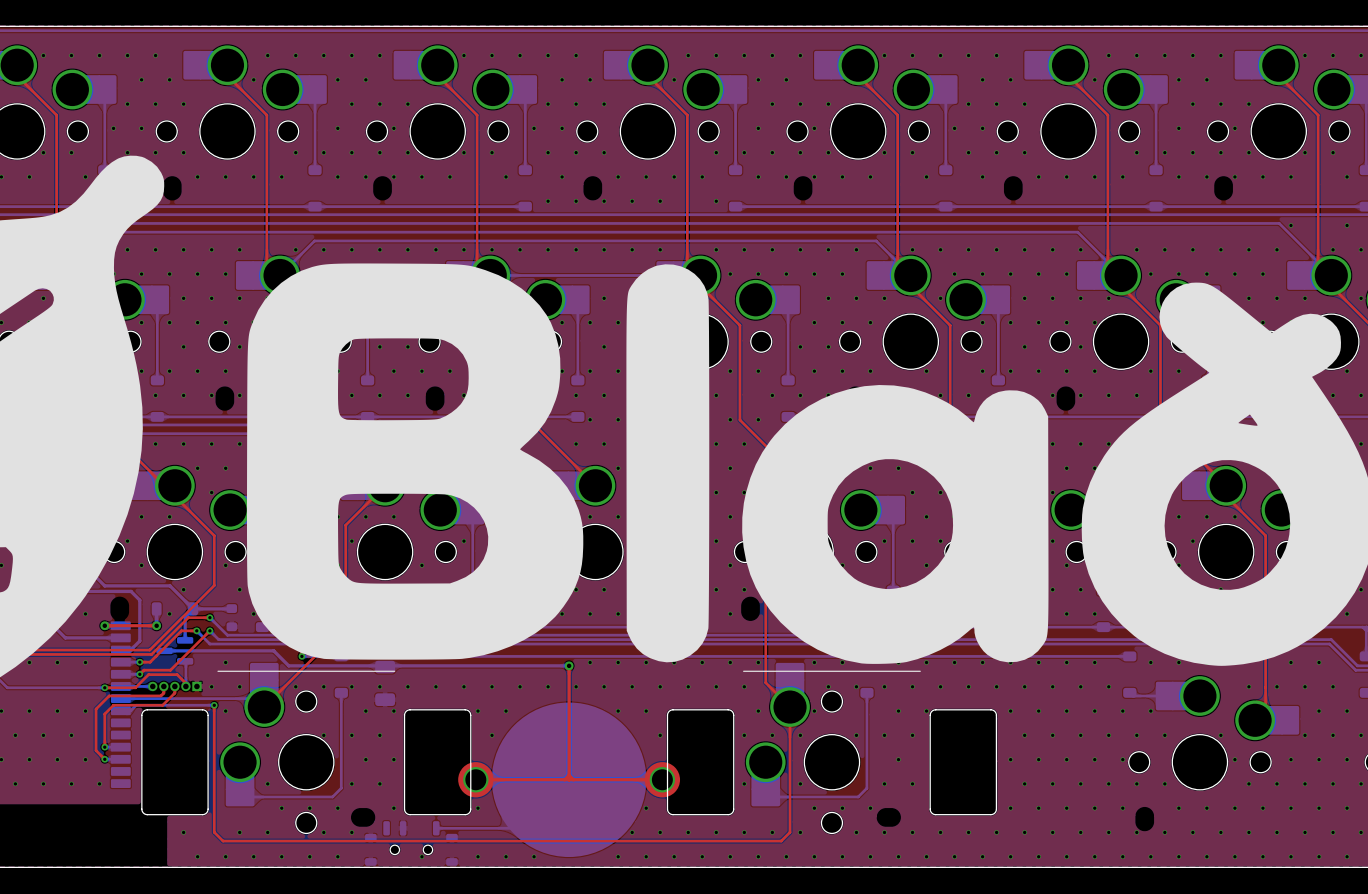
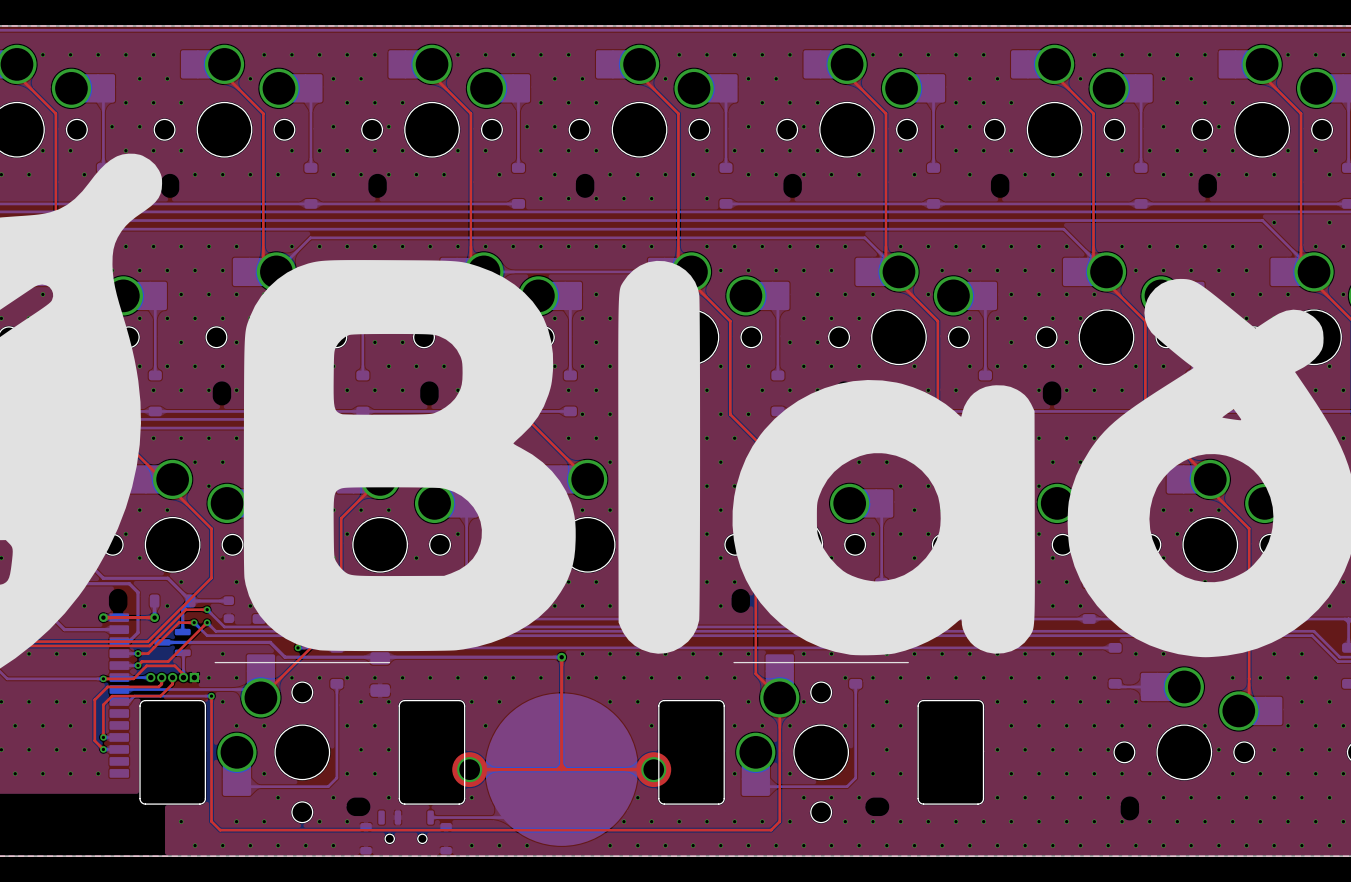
via: (828, 686) -> none
via: (926, 711) -> none
via: (323, 735) -> none
via: (309, 808) -> none
via: (421, 856) -> none

